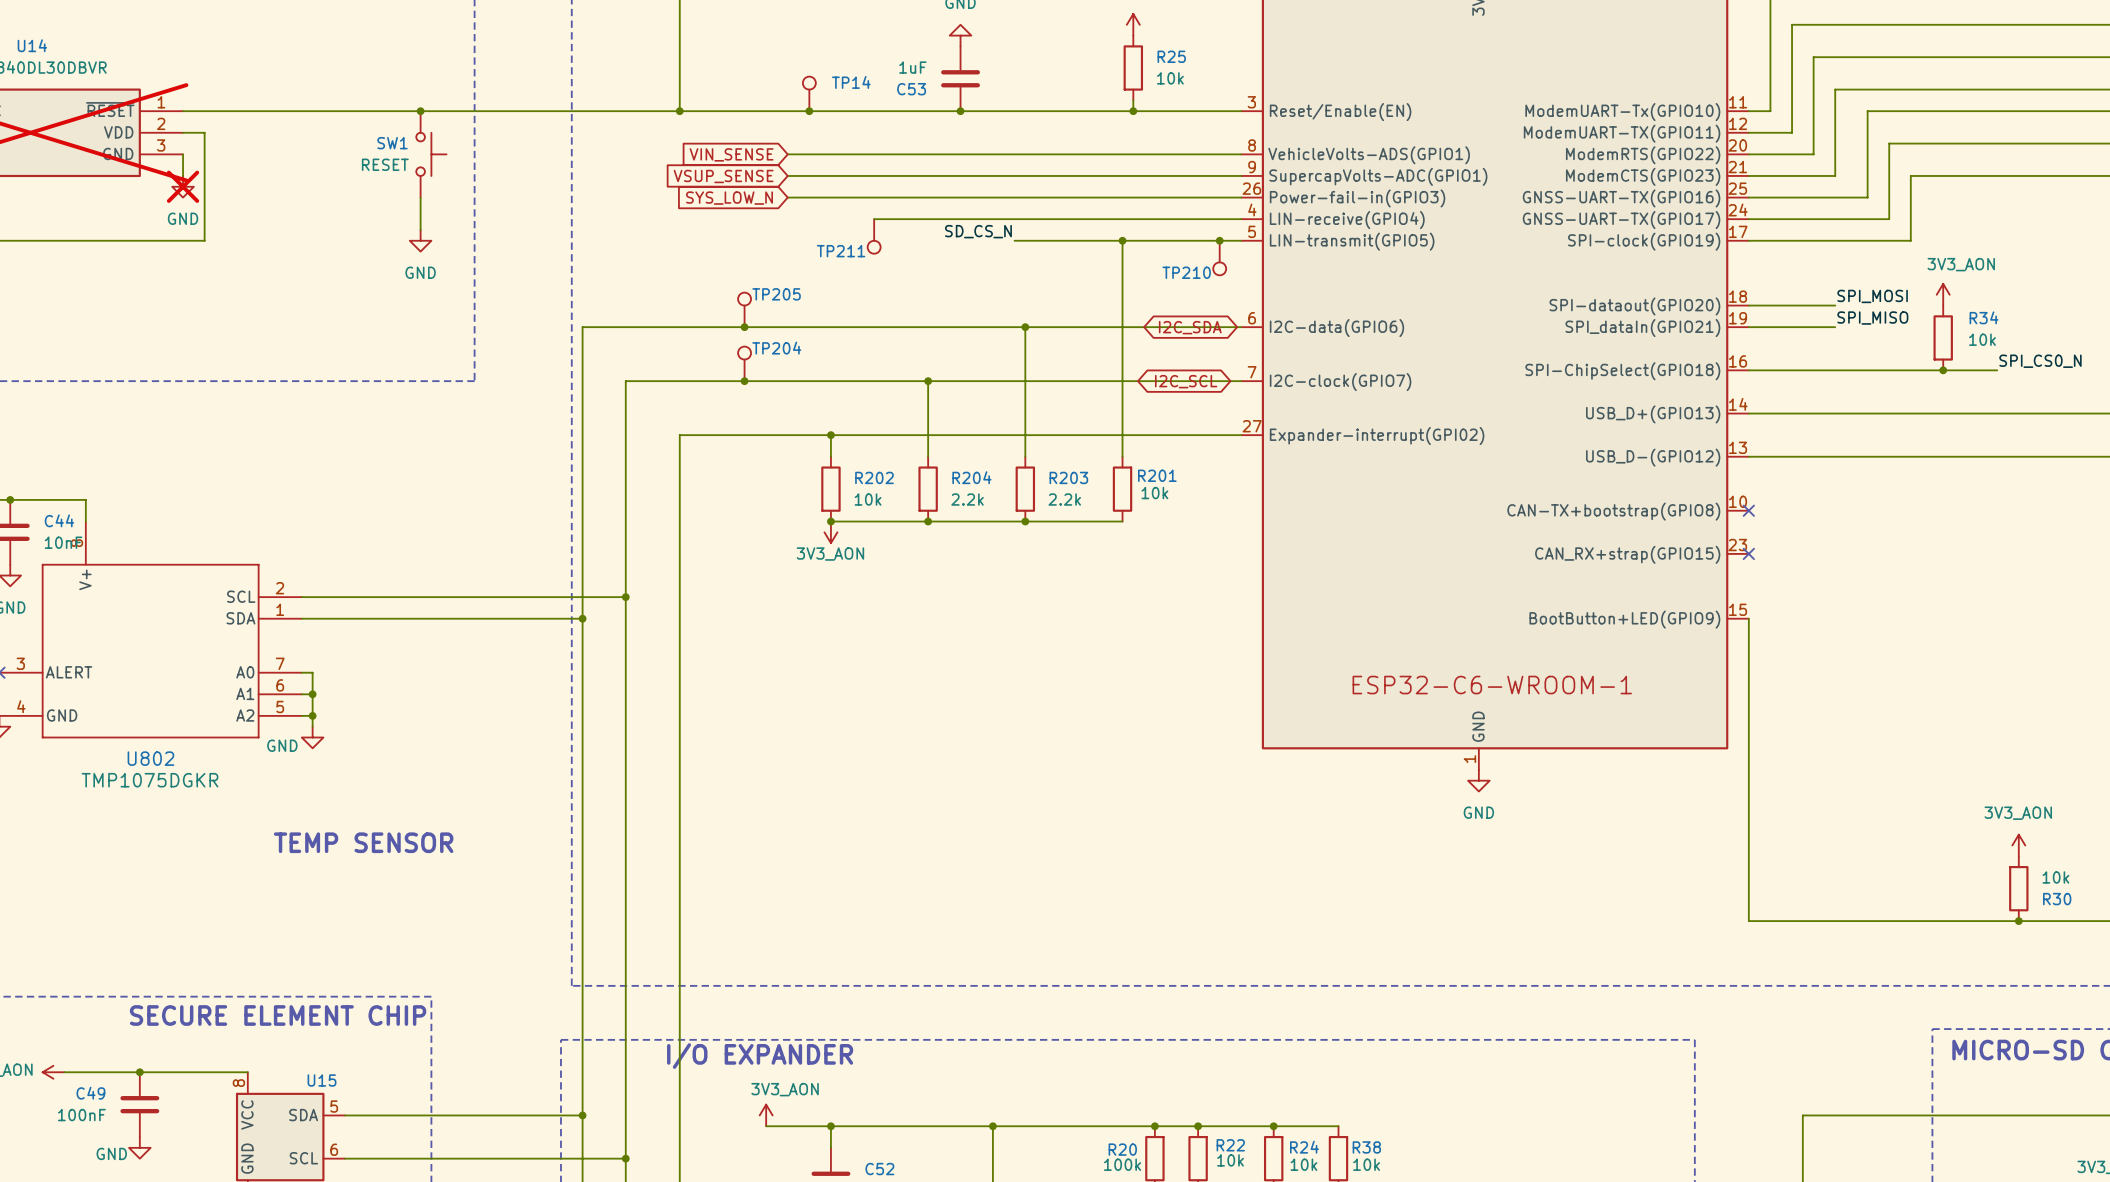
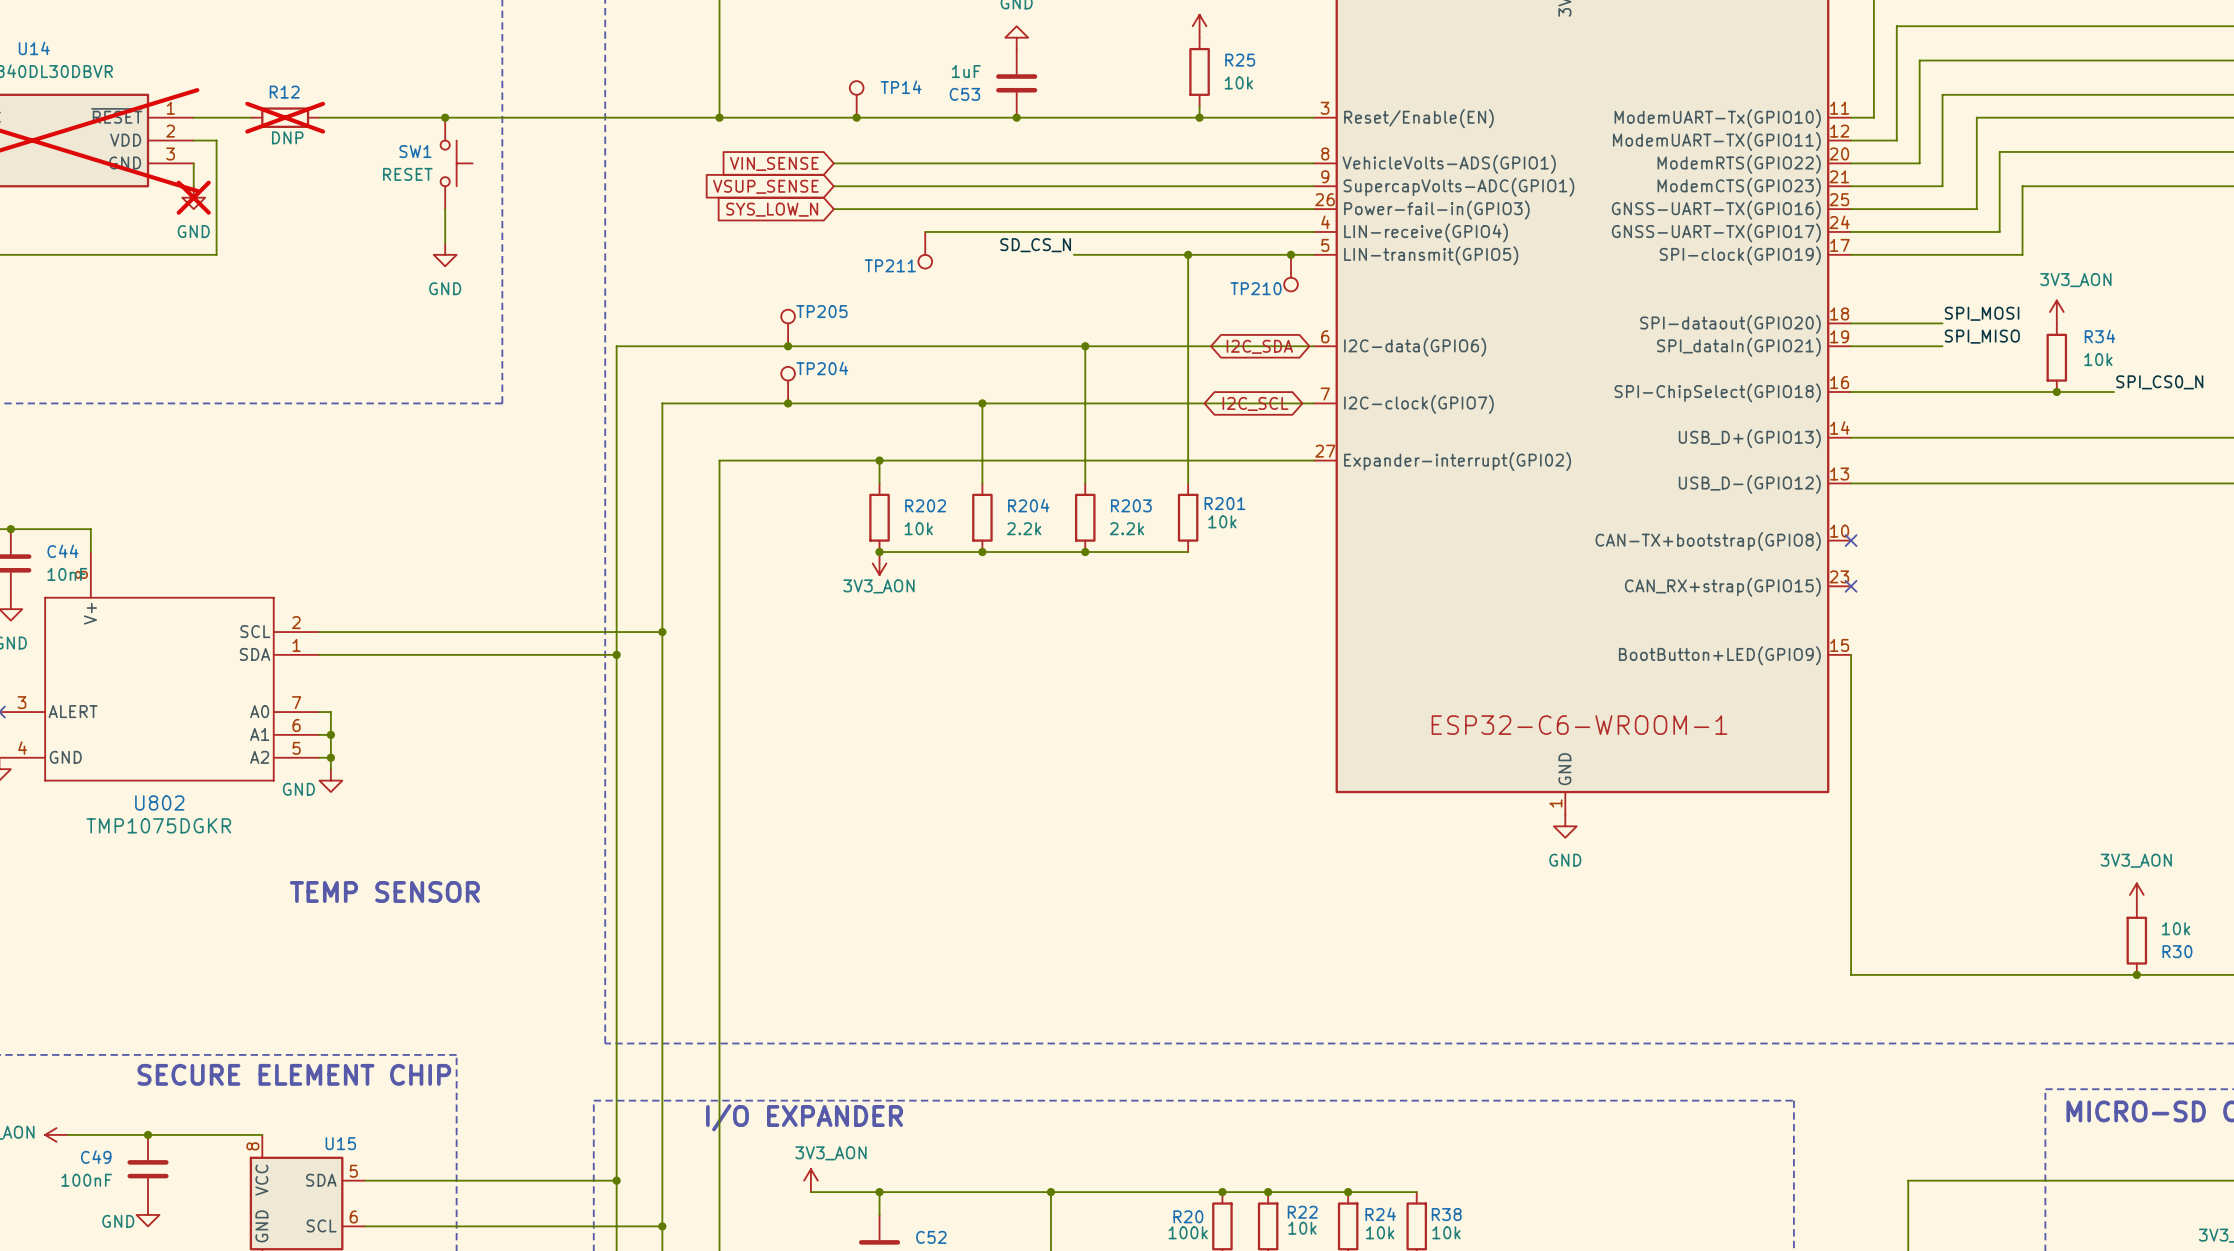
R12: none -> DNP (285, 117)

